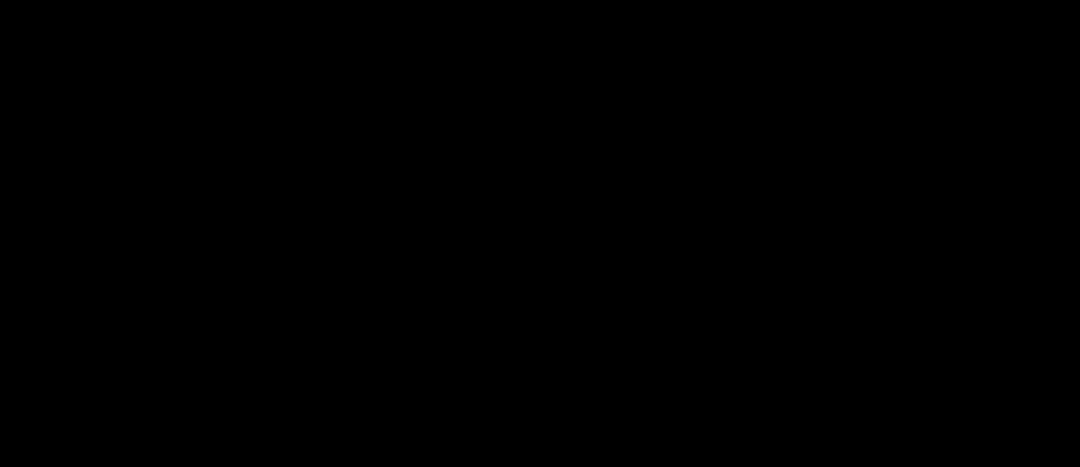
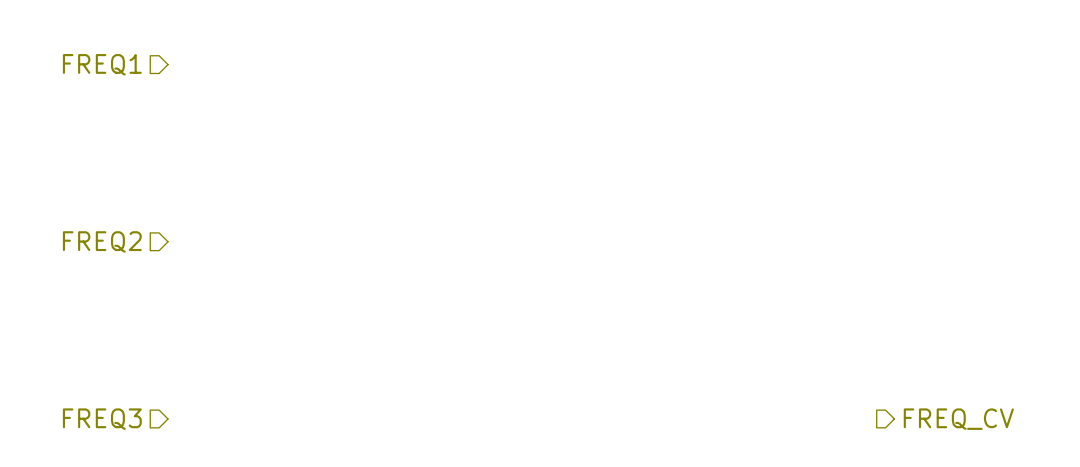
hierarchical label: none -> FREQ1 (102, 64)
hierarchical label: none -> FREQ2 (102, 241)
hierarchical label: none -> FREQ3 (102, 419)
hierarchical label: none -> FREQ_CV (958, 419)

